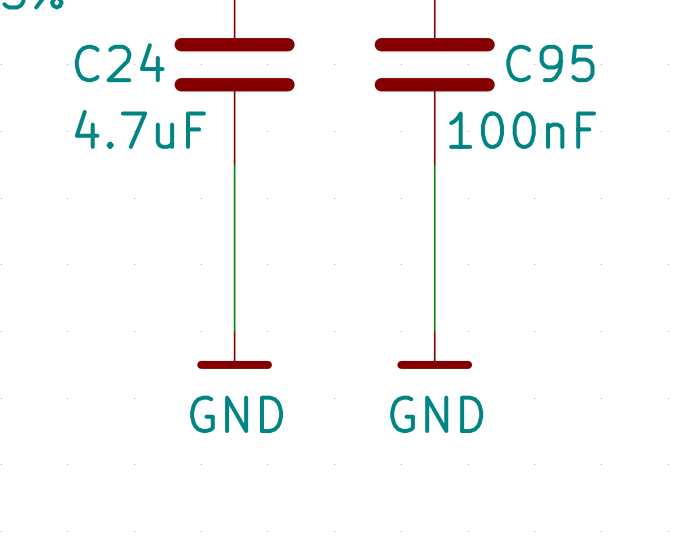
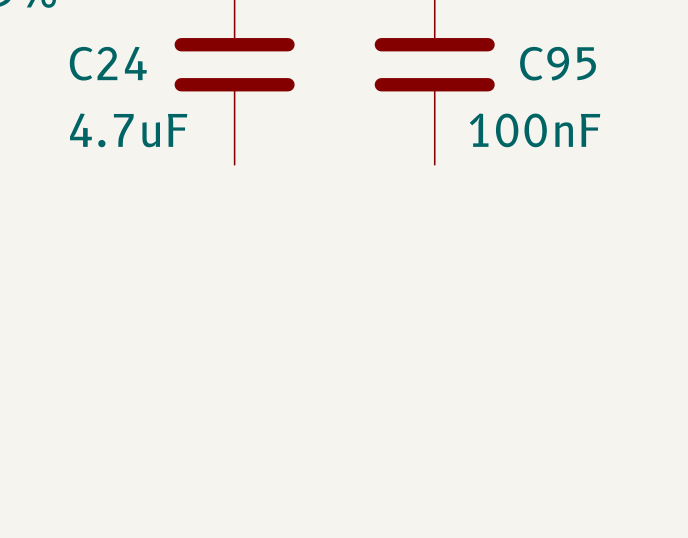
wire: (234, 164) (234, 331) -> none
wire: (434, 164) (434, 331) -> none
power symbol: GND (234, 350) -> none
power symbol: GND (434, 350) -> none

